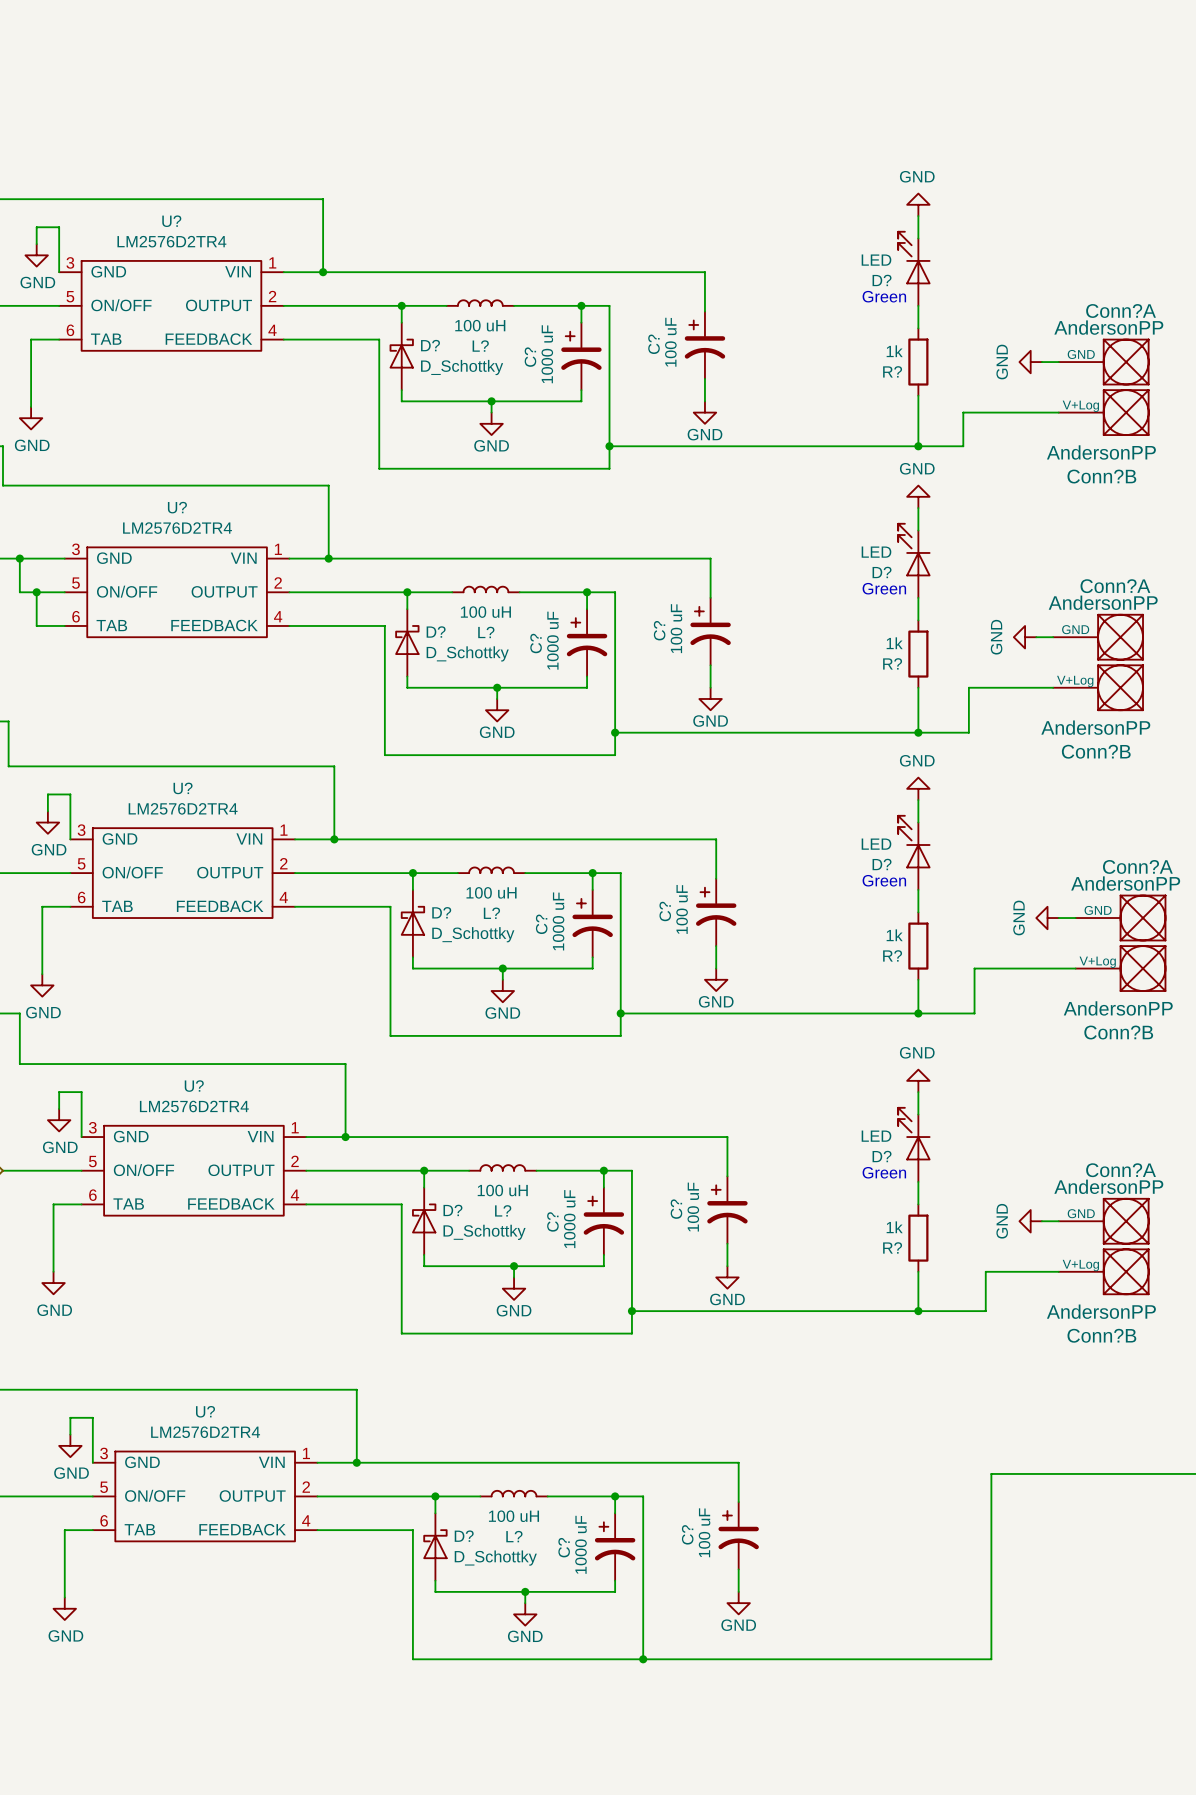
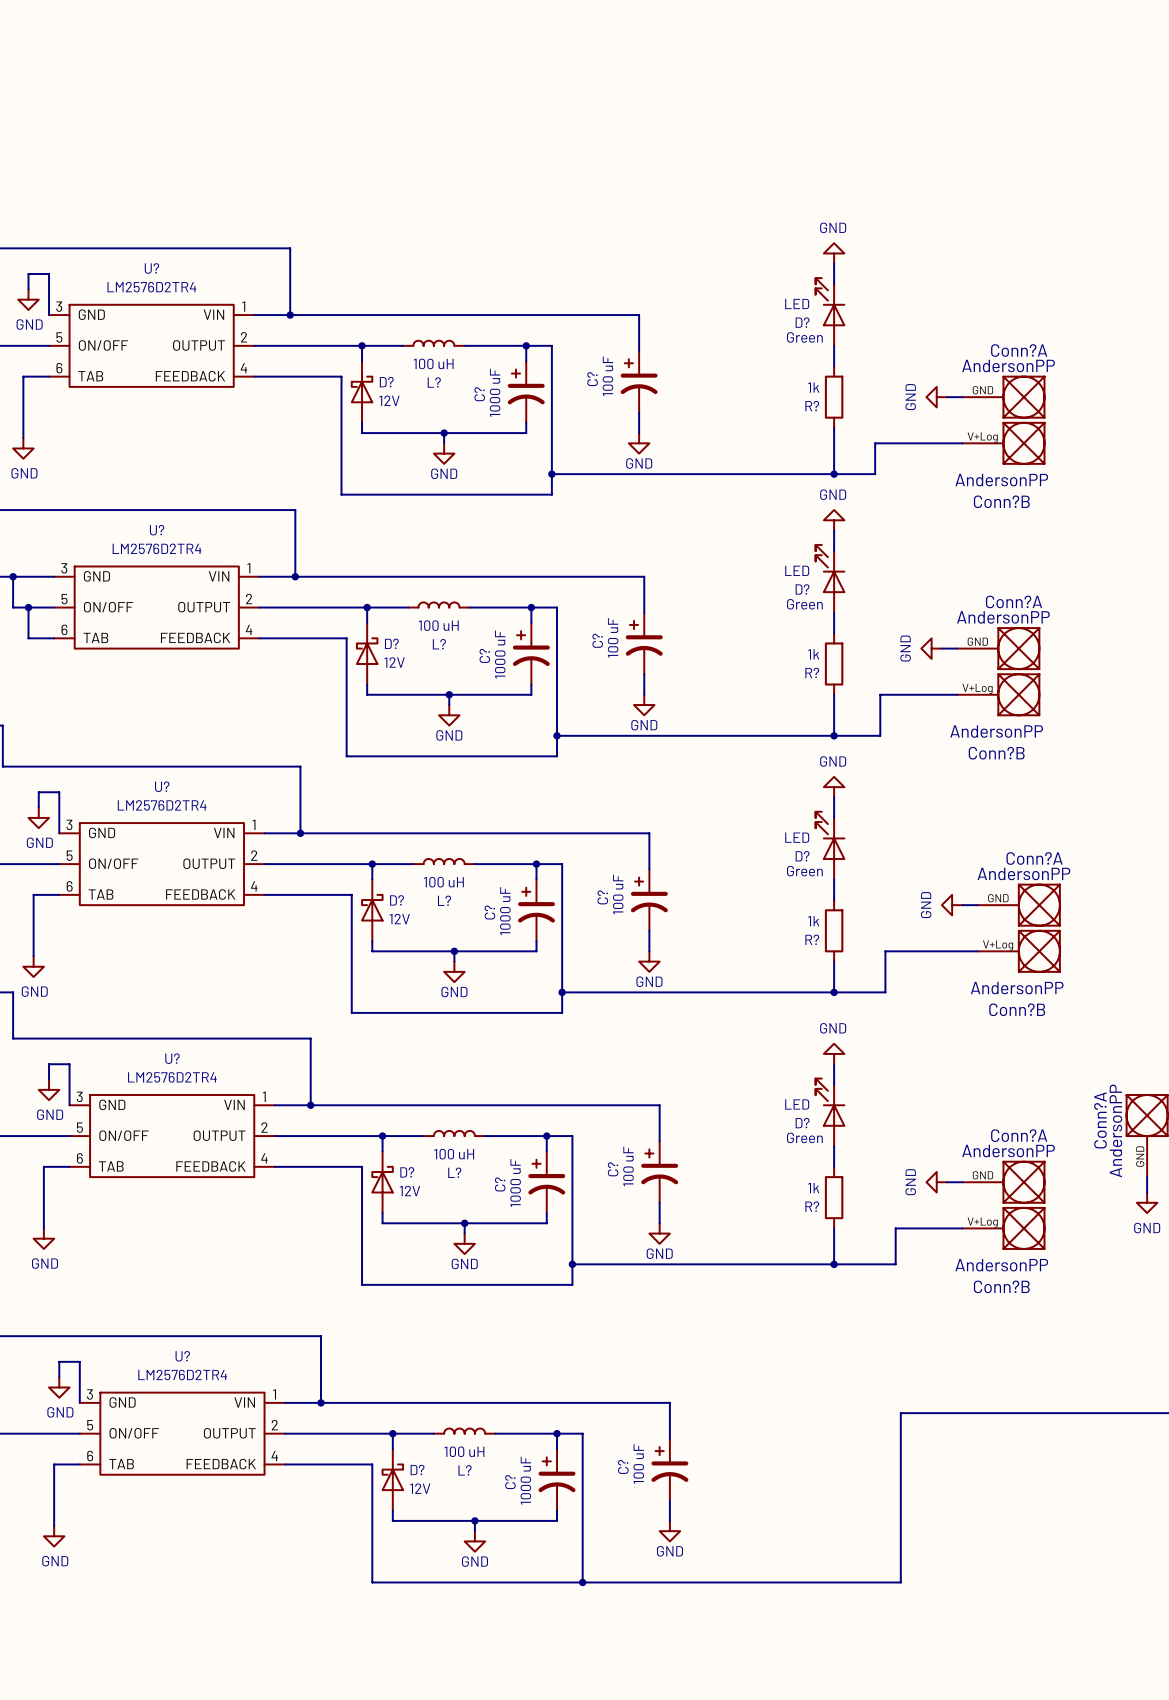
D? value: D_Schottky (462, 367) -> 12V (389, 400)
D? value: D_Schottky (467, 653) -> 12V (394, 662)
D? value: D_Schottky (473, 934) -> 12V (399, 919)
D? value: D_Schottky (484, 1232) -> 12V (409, 1191)
D? value: D_Schottky (495, 1558) -> 12V (420, 1488)

